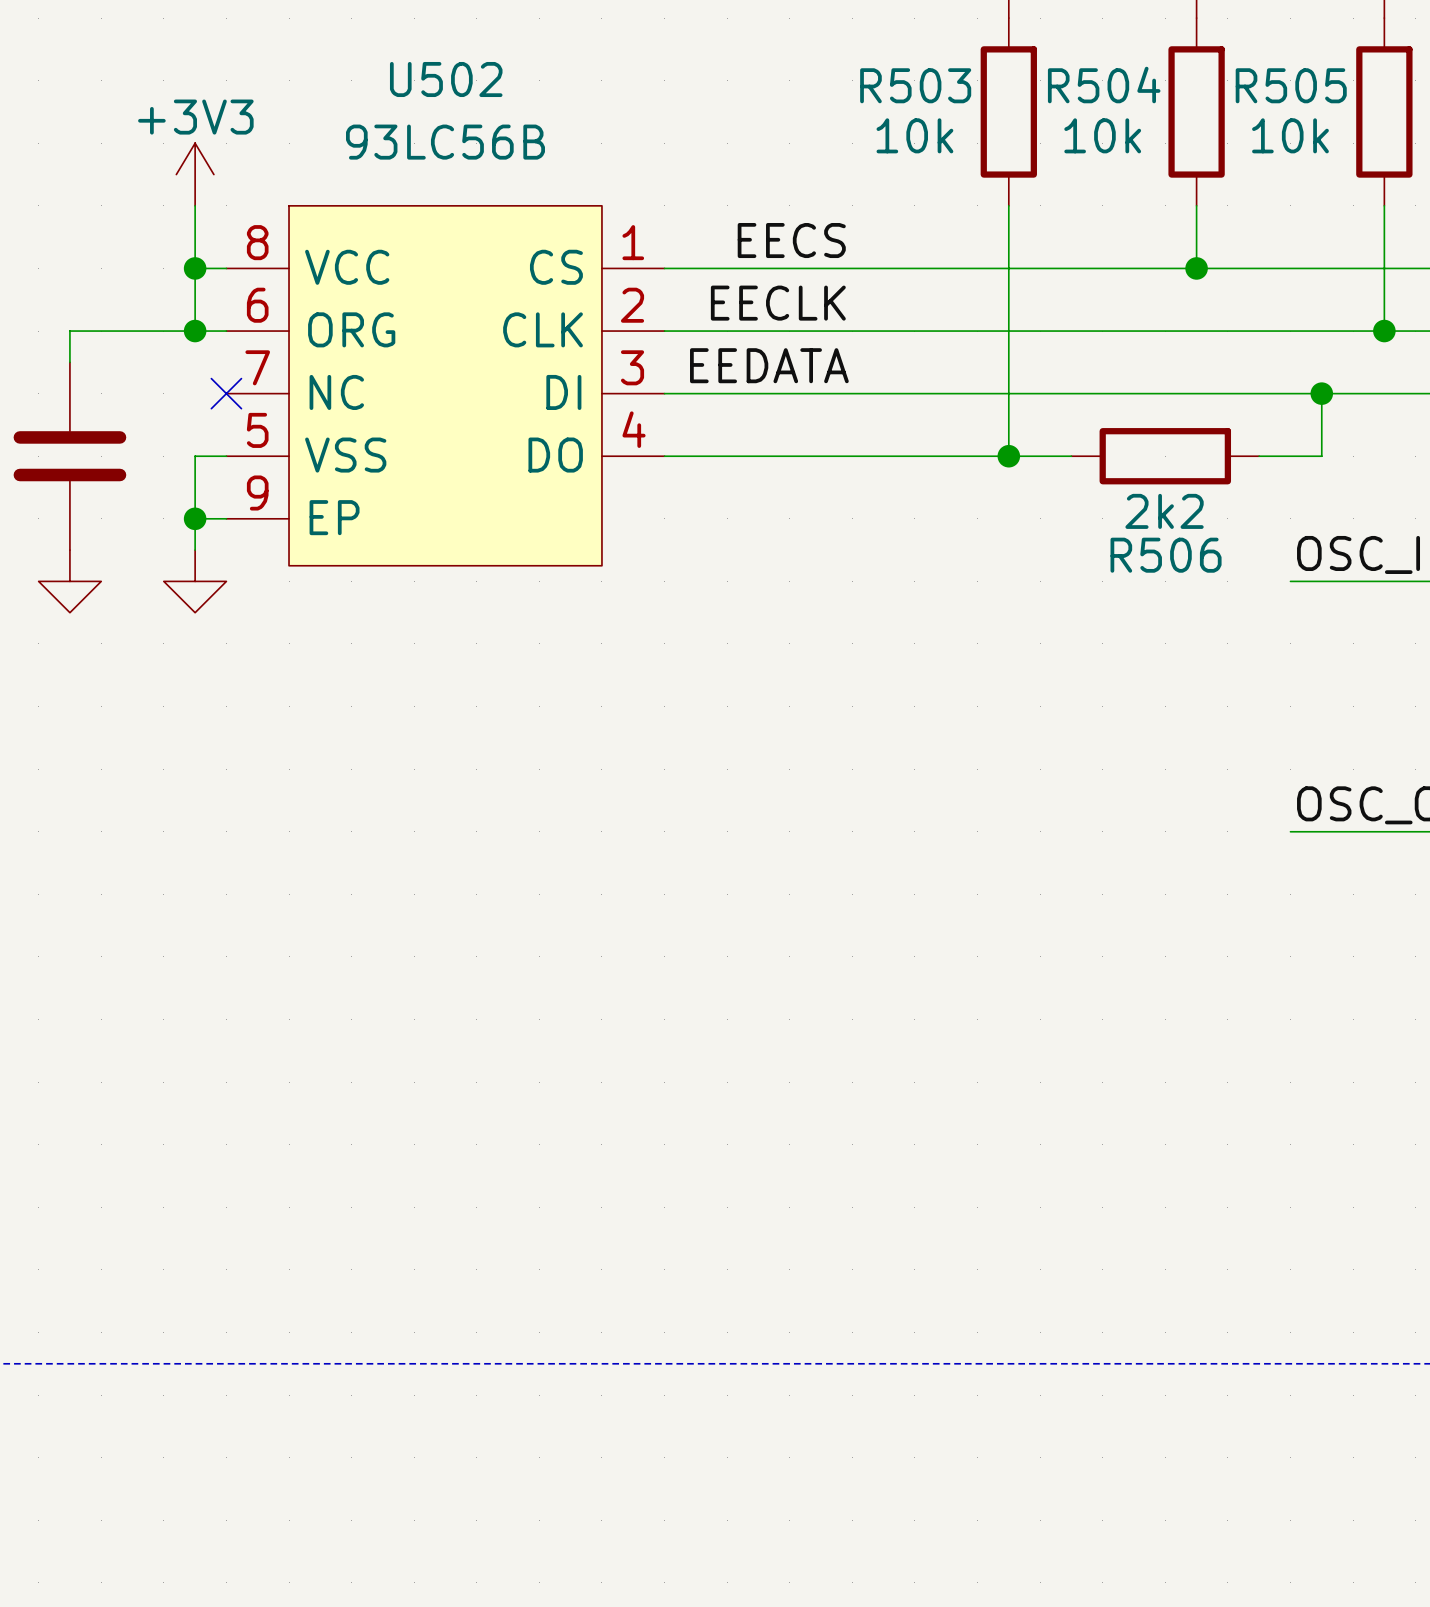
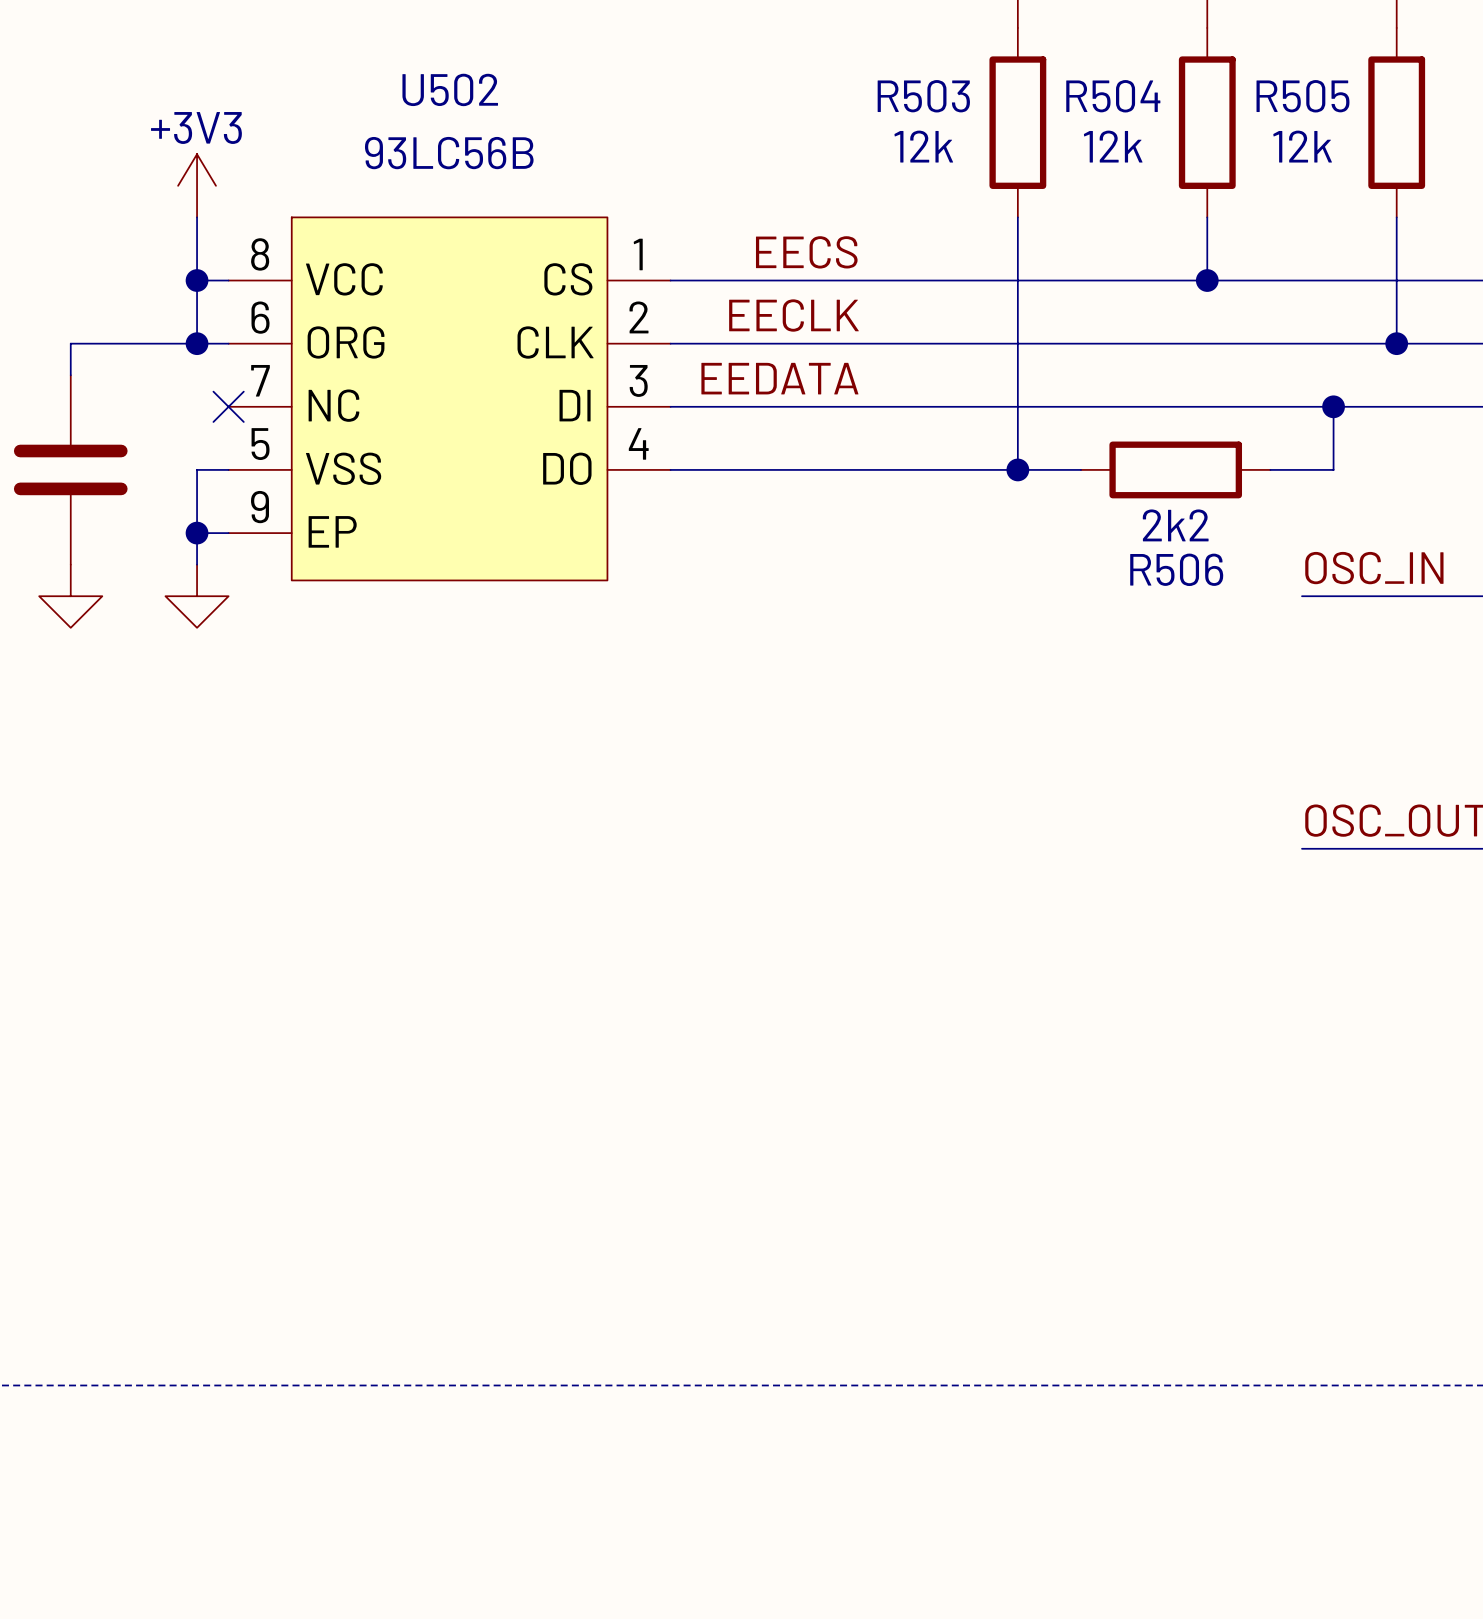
R503 value: 10k (914, 135) -> 12k (923, 146)
R504 value: 10k (1102, 135) -> 12k (1113, 146)
R505 value: 10k (1290, 135) -> 12k (1302, 146)

